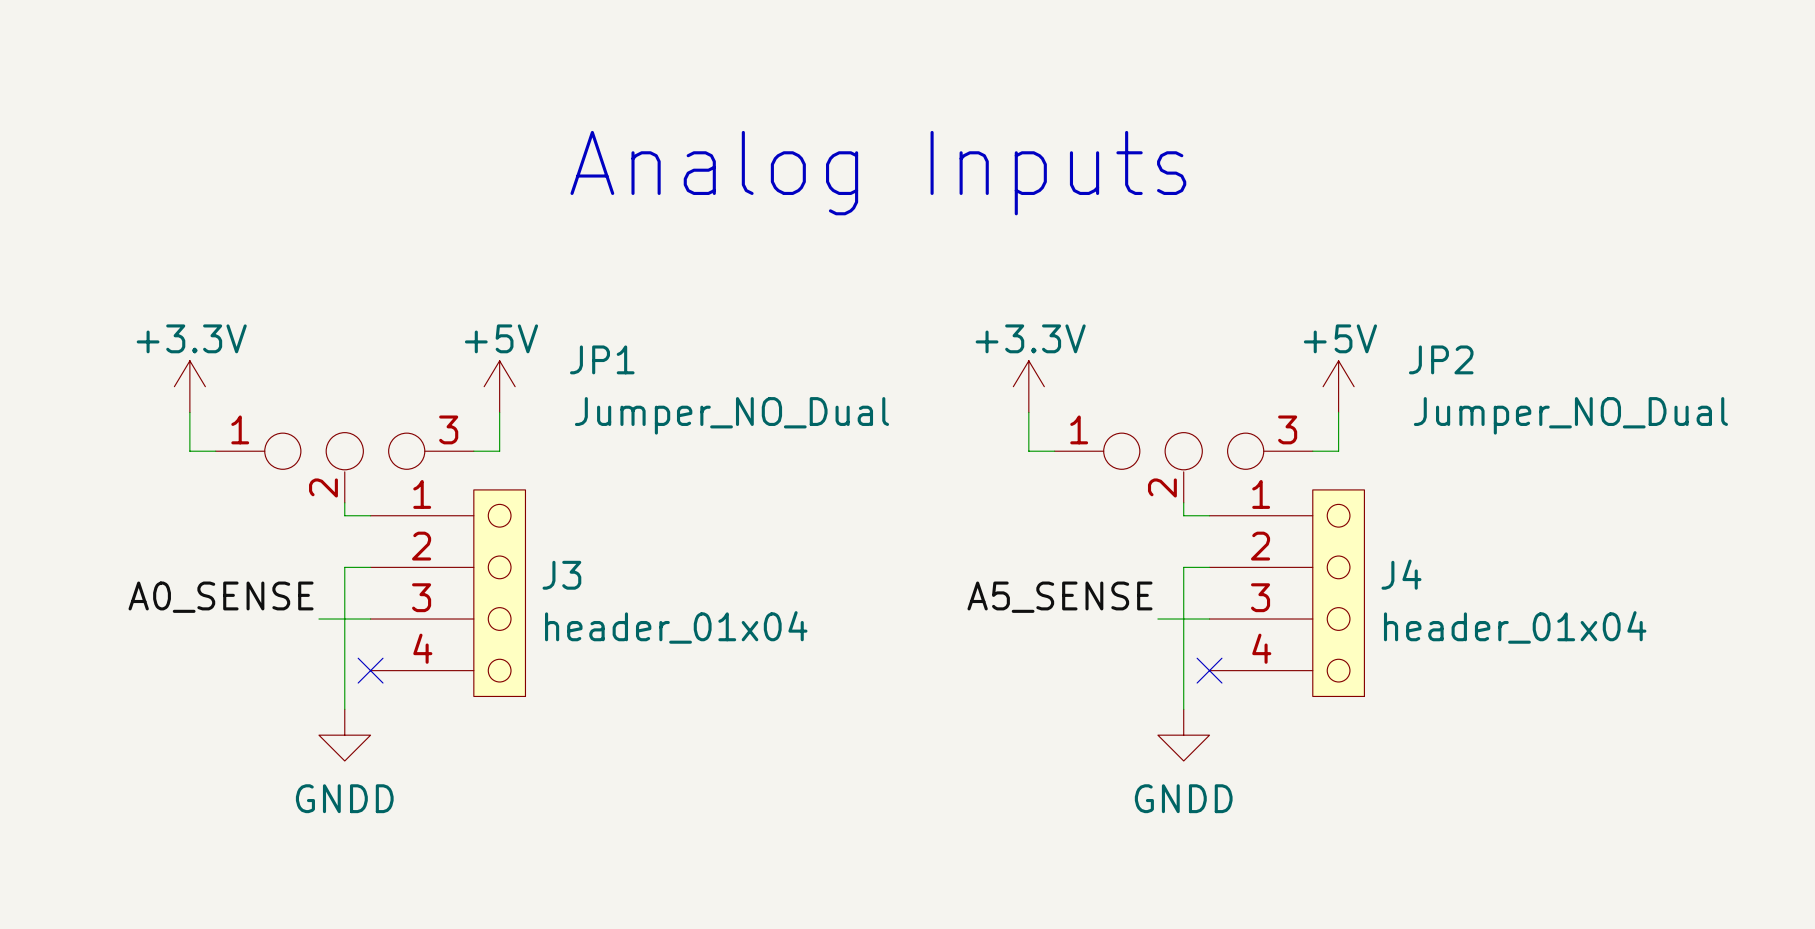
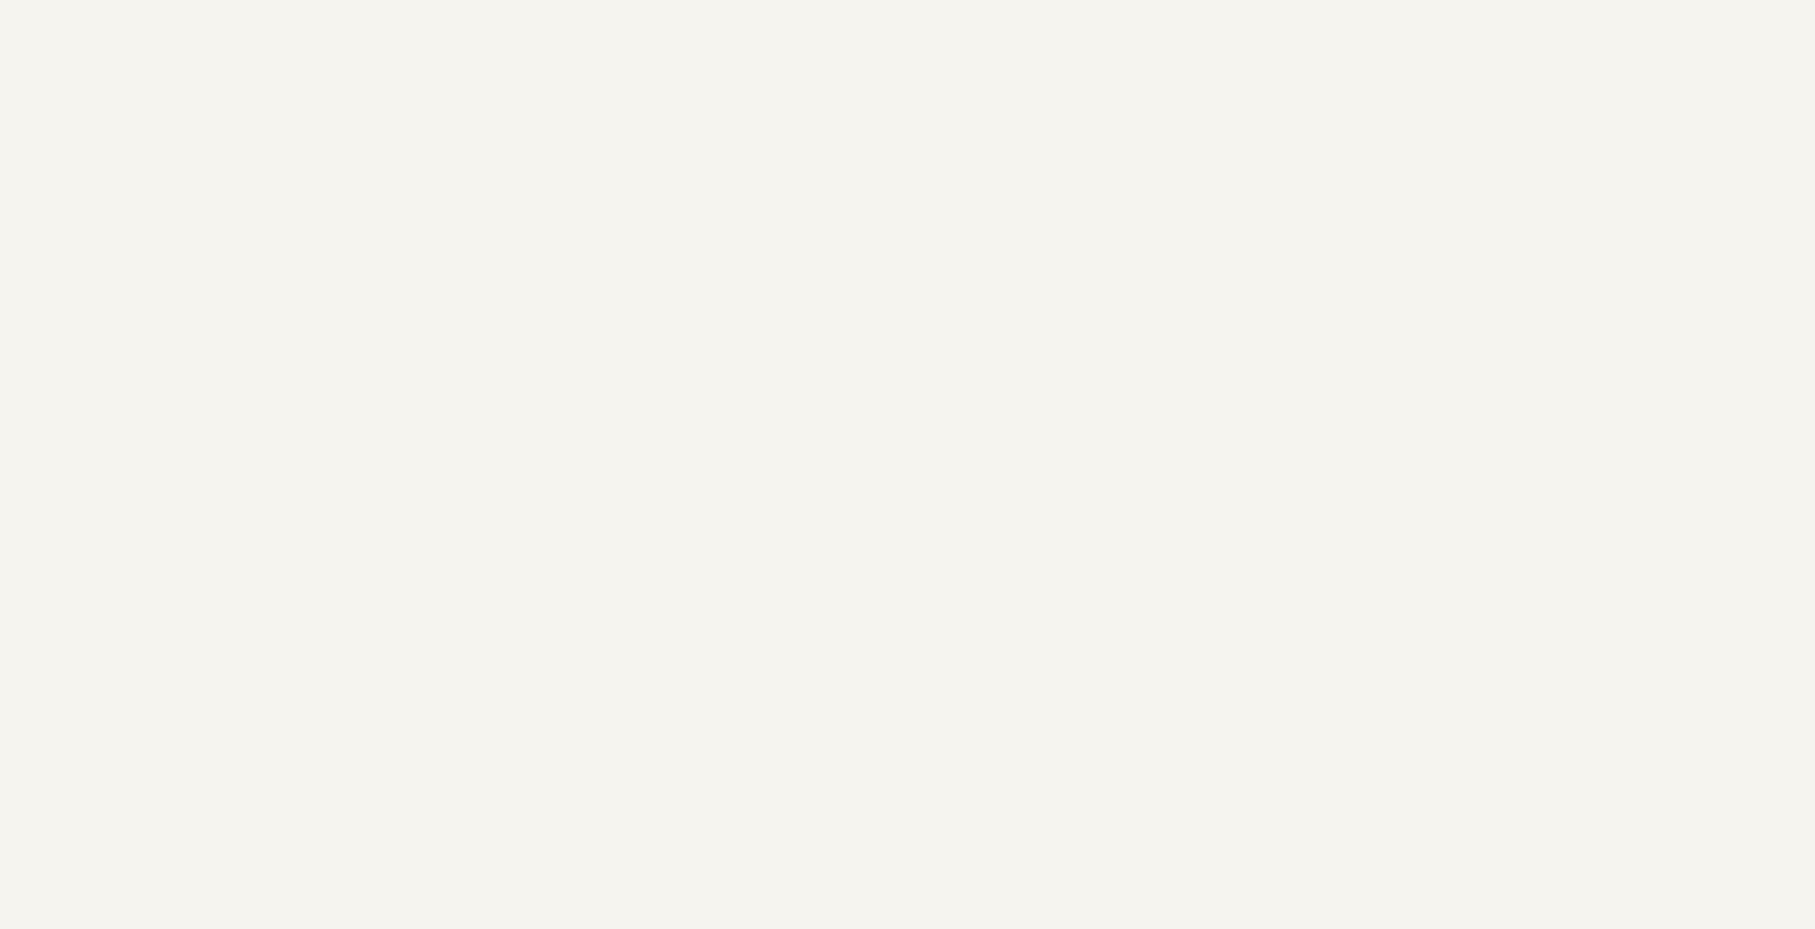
text: Analog Inputs (878, 173) -> none
power symbol: +3.3V (189, 386) -> none
power symbol: +5V (499, 386) -> none
power symbol: +3.3V (1028, 386) -> none
power symbol: +5V (1338, 386) -> none
wire: (189, 412) (189, 451) (215, 451) -> none
wire: (499, 412) (499, 451) (473, 451) -> none
wire: (1028, 412) (1028, 451) (1054, 451) -> none
wire: (1338, 412) (1338, 451) (1312, 451) -> none
JP1: Jumper_NO_Dual (344, 467) -> none
JP2: Jumper_NO_Dual (1183, 467) -> none
wire: (344, 502) (344, 515) (370, 515) -> none
wire: (1183, 502) (1183, 515) (1209, 515) -> none
wire: (370, 567) (344, 567) (344, 709) -> none
wire: (1209, 567) (1183, 567) (1183, 709) -> none
J3: header_01x04 (448, 593) -> none
J4: header_01x04 (1286, 593) -> none
label: A0_SENSE (221, 597) -> none
label: A5_SENSE (1059, 597) -> none
wire: (318, 619) (370, 619) -> none
wire: (1157, 619) (1209, 619) -> none
no-connect mark: (370, 670) -> none
no-connect mark: (1209, 670) -> none
power symbol: GNDD (344, 735) -> none
power symbol: GNDD (1183, 735) -> none

